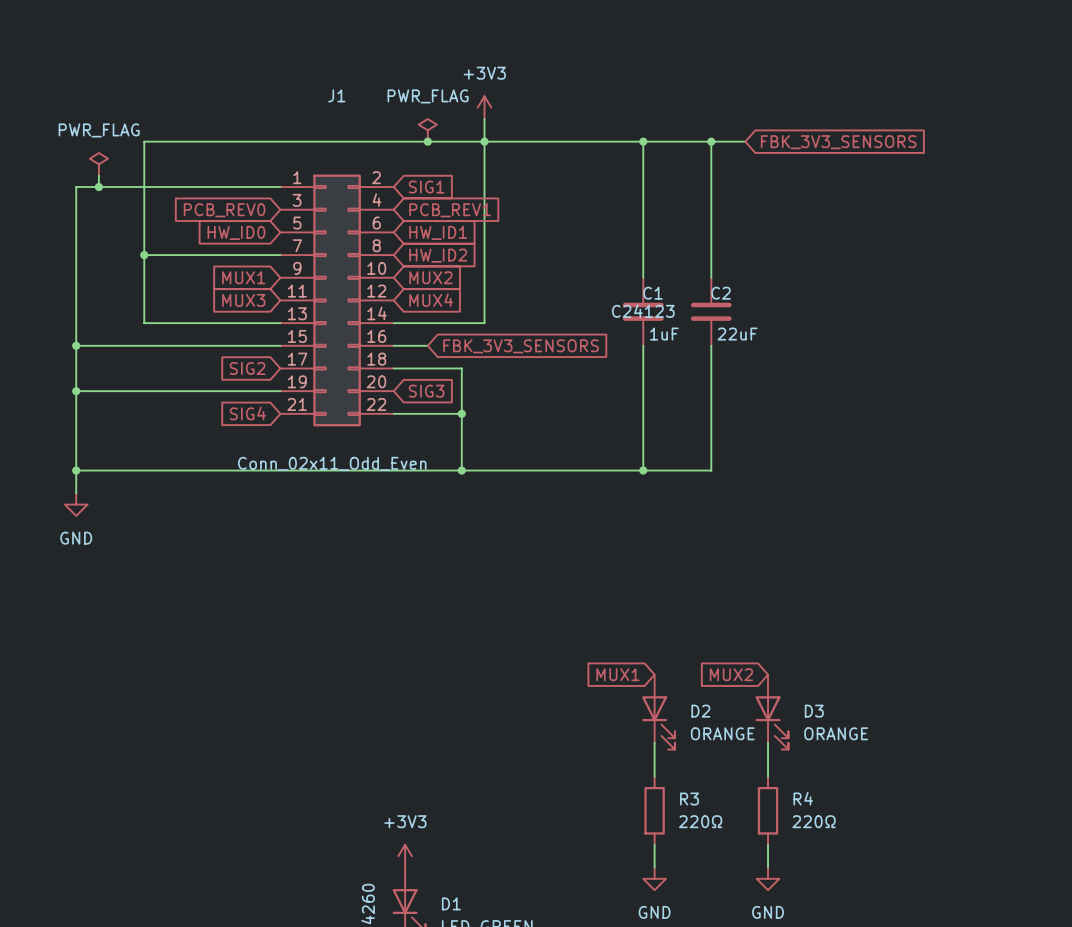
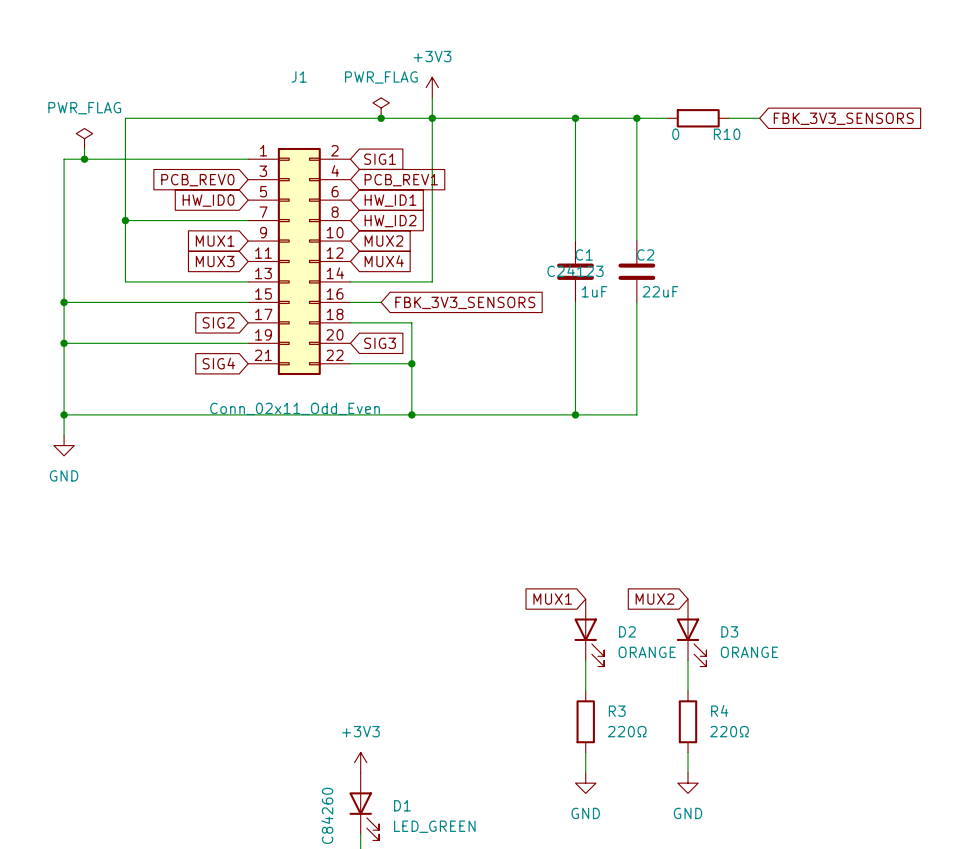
R10: none -> 0 (698, 118)
wire: none -> (728, 118) (759, 118)
global label position: FBK_3V3_SENSORS (838, 142) -> FBK_3V3_SENSORS (843, 118)

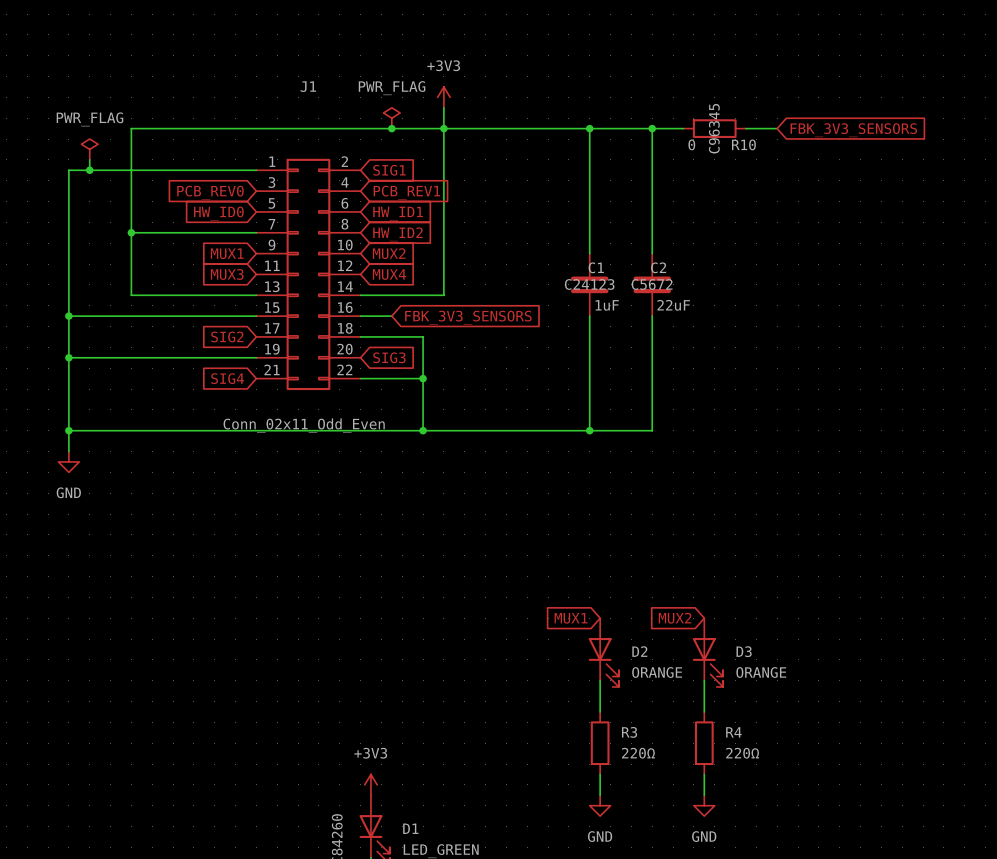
R10 text: none -> C96345 (714, 128)
C2 text: none -> C5672 (652, 284)

